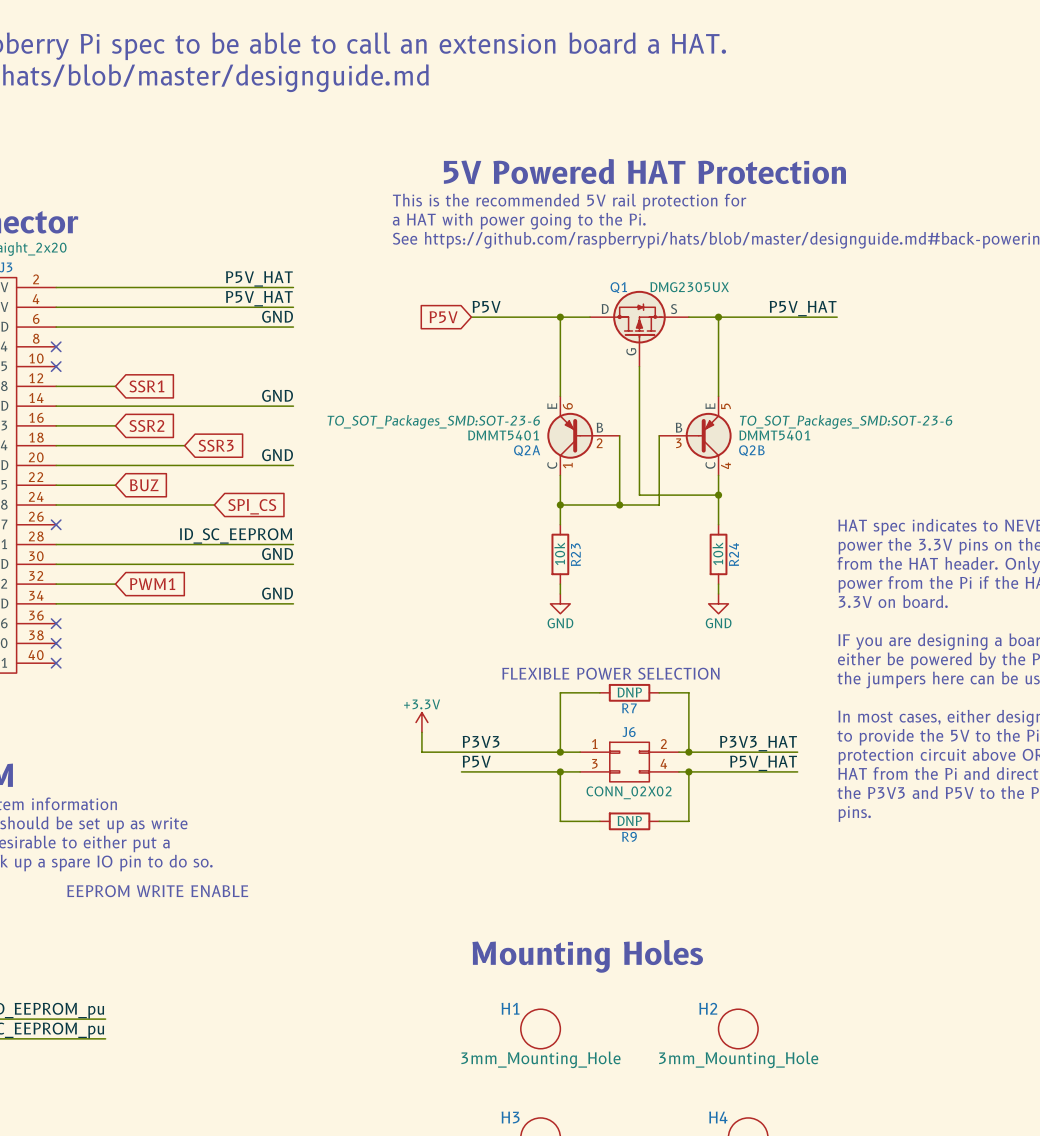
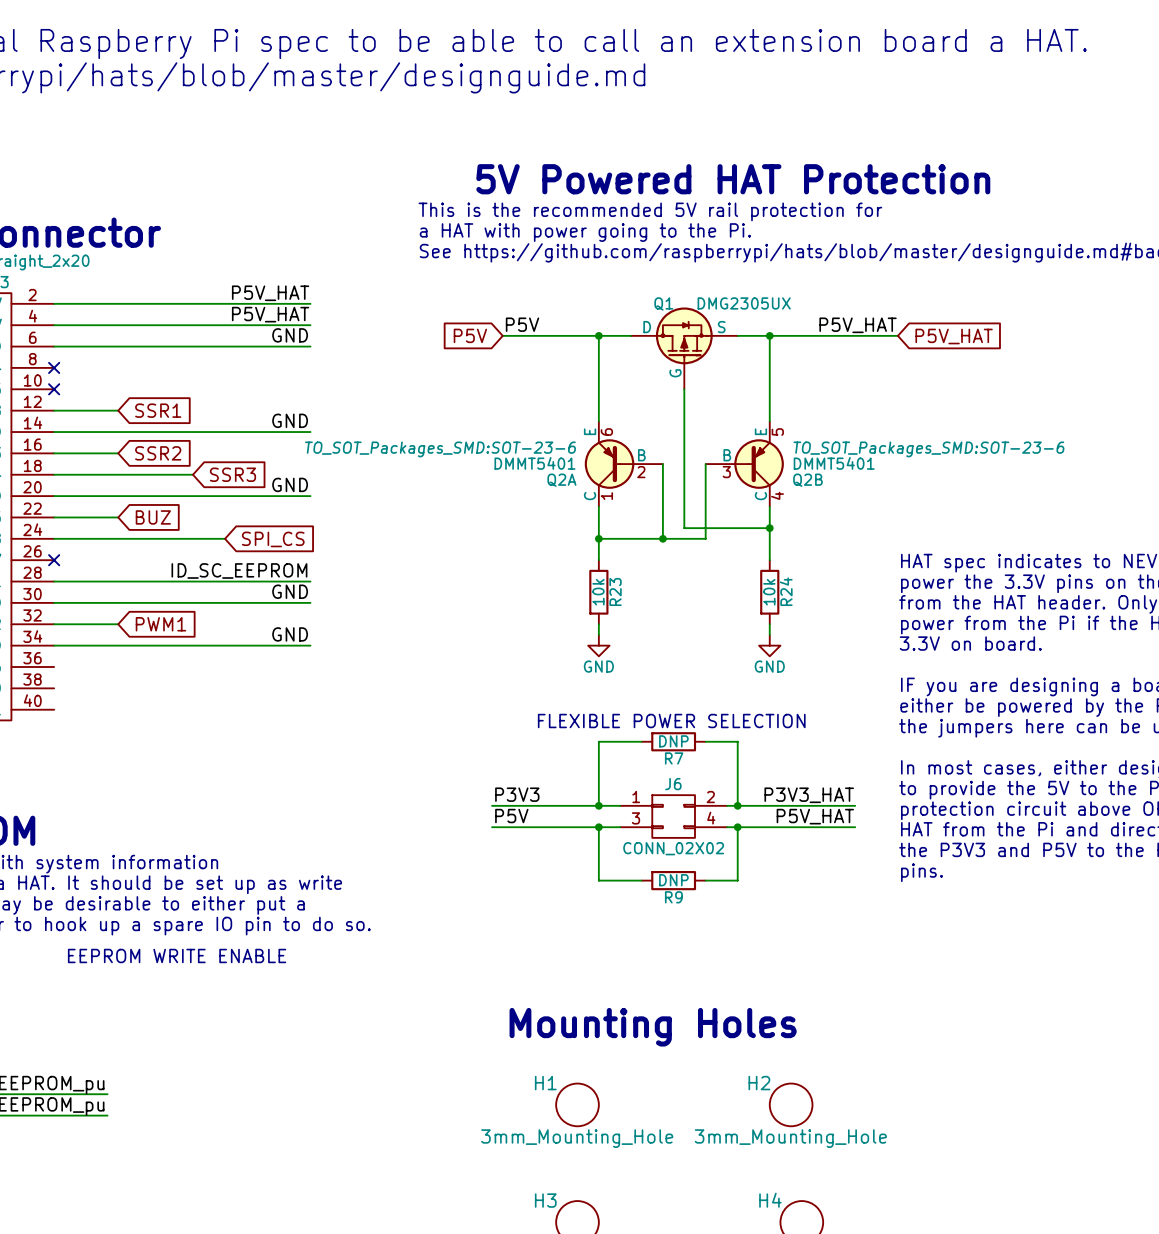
global label: none -> P5V_HAT (954, 336)
no-connect mark: (56, 623) -> none
no-connect mark: (56, 643) -> none
no-connect mark: (56, 663) -> none
power symbol: +3.3V (421, 722) -> none
wire: (421, 732) (421, 752) (461, 752) -> none

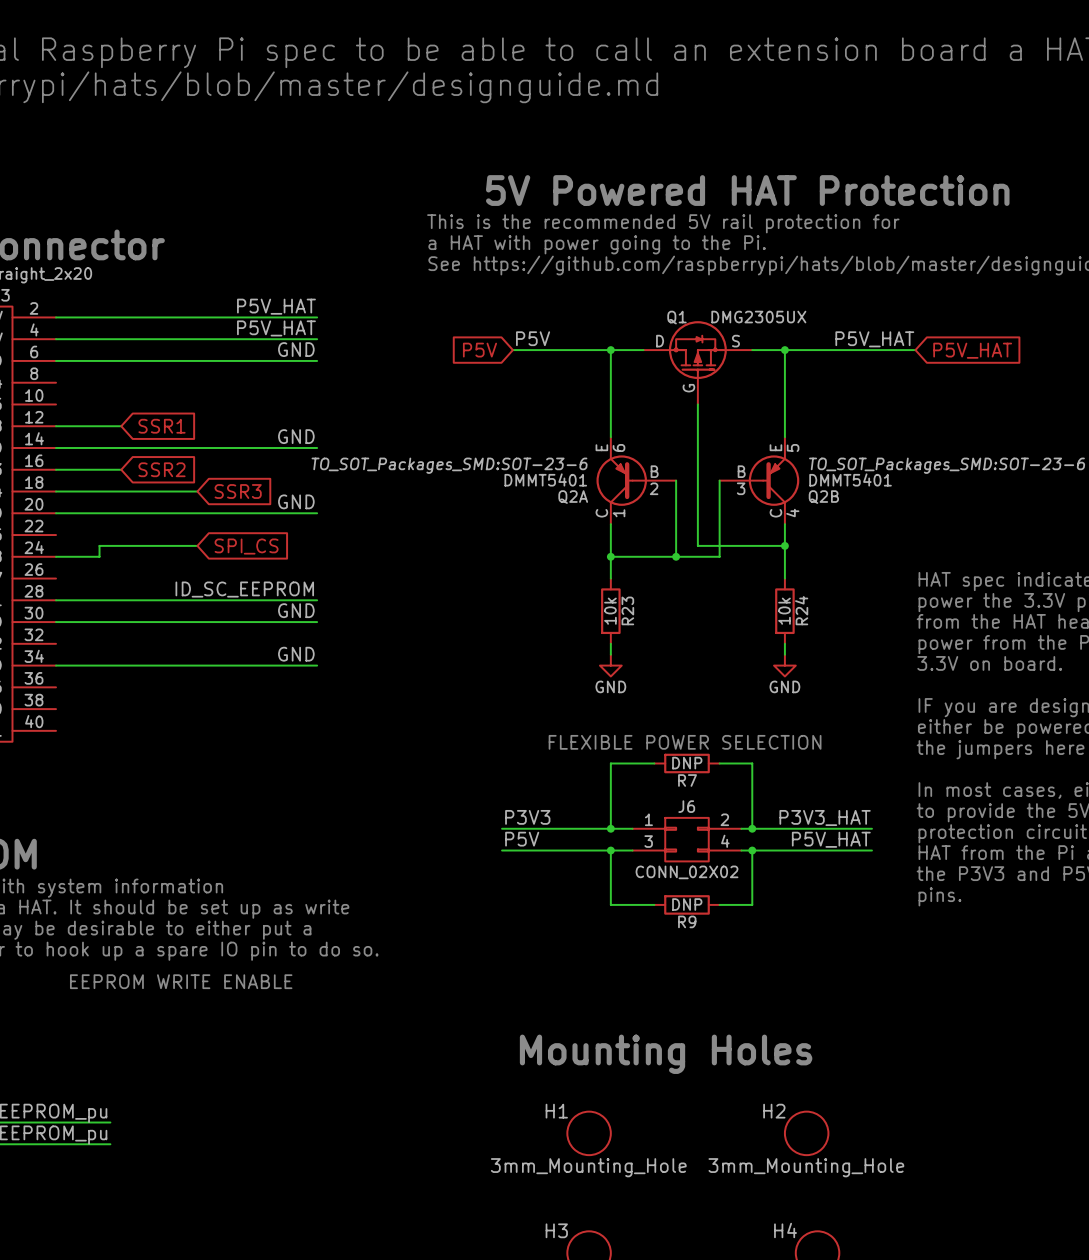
no-connect mark: (54, 367) -> none
no-connect mark: (54, 389) -> none
wire: (54, 517) (118, 517) -> none
global label: BUZ (153, 517) -> none
wire: (96, 538) (225, 538) -> (99, 556) (99, 545) (197, 545)
global label position: SPI_CS (273, 539) -> SPI_CS (246, 546)
no-connect mark: (54, 560) -> none
wire: (54, 624) (118, 624) -> none
global label: PWM1 (160, 624) -> none

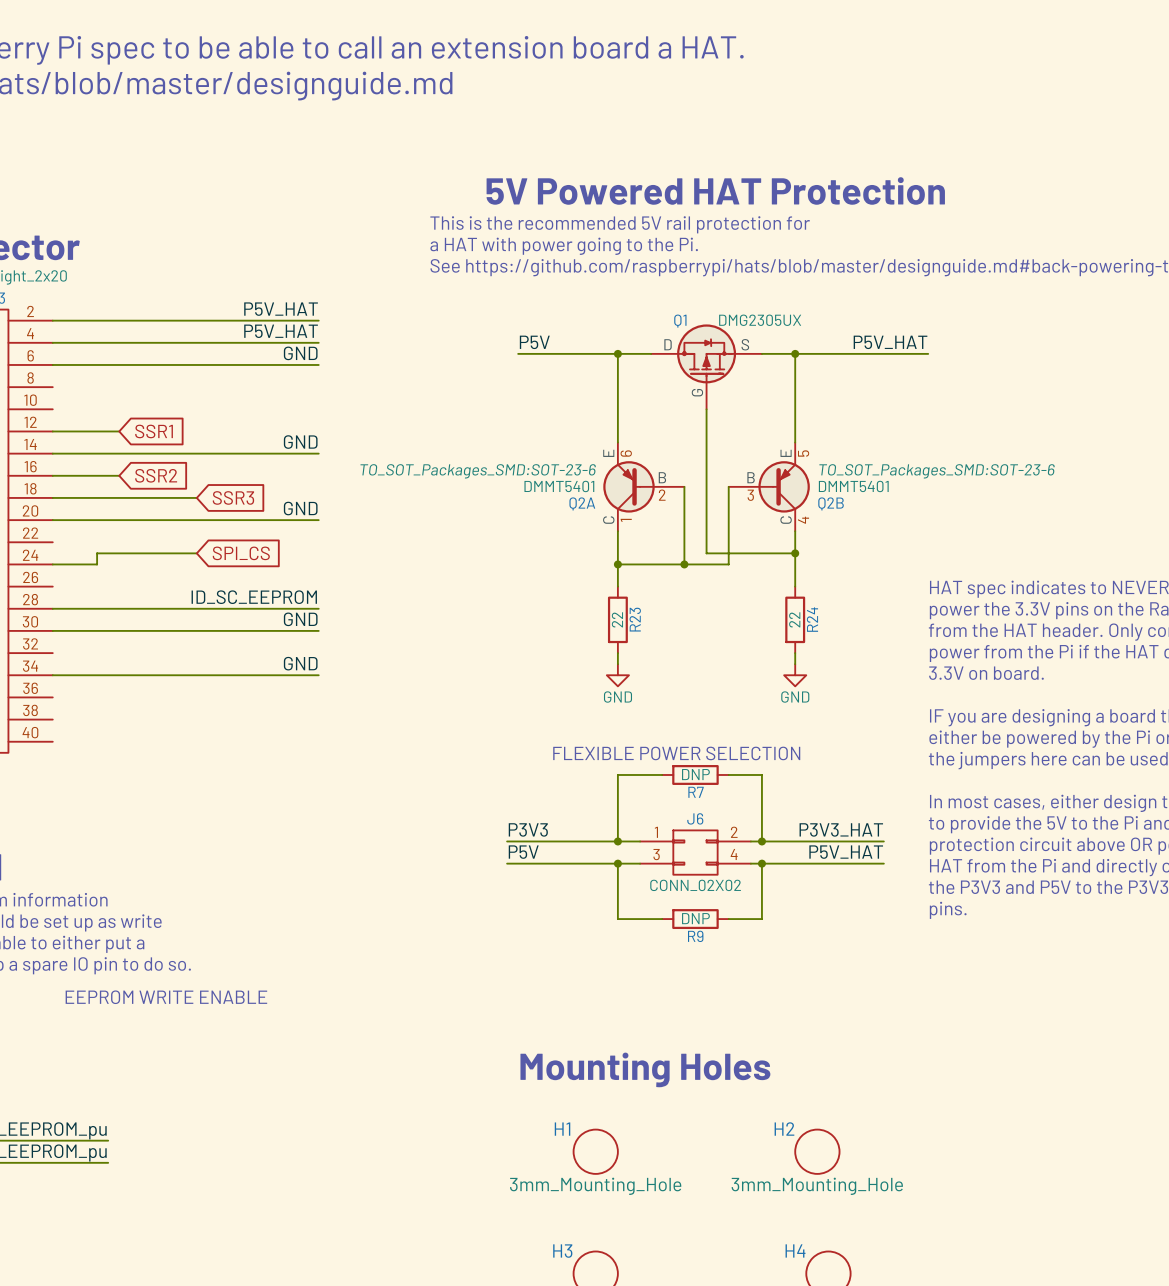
global label: P5V (479, 350) -> none
global label: P5V_HAT (972, 350) -> none
R23 value: 10k (610, 611) -> 22 (617, 619)
R24 value: 10k (784, 611) -> 22 (794, 619)

